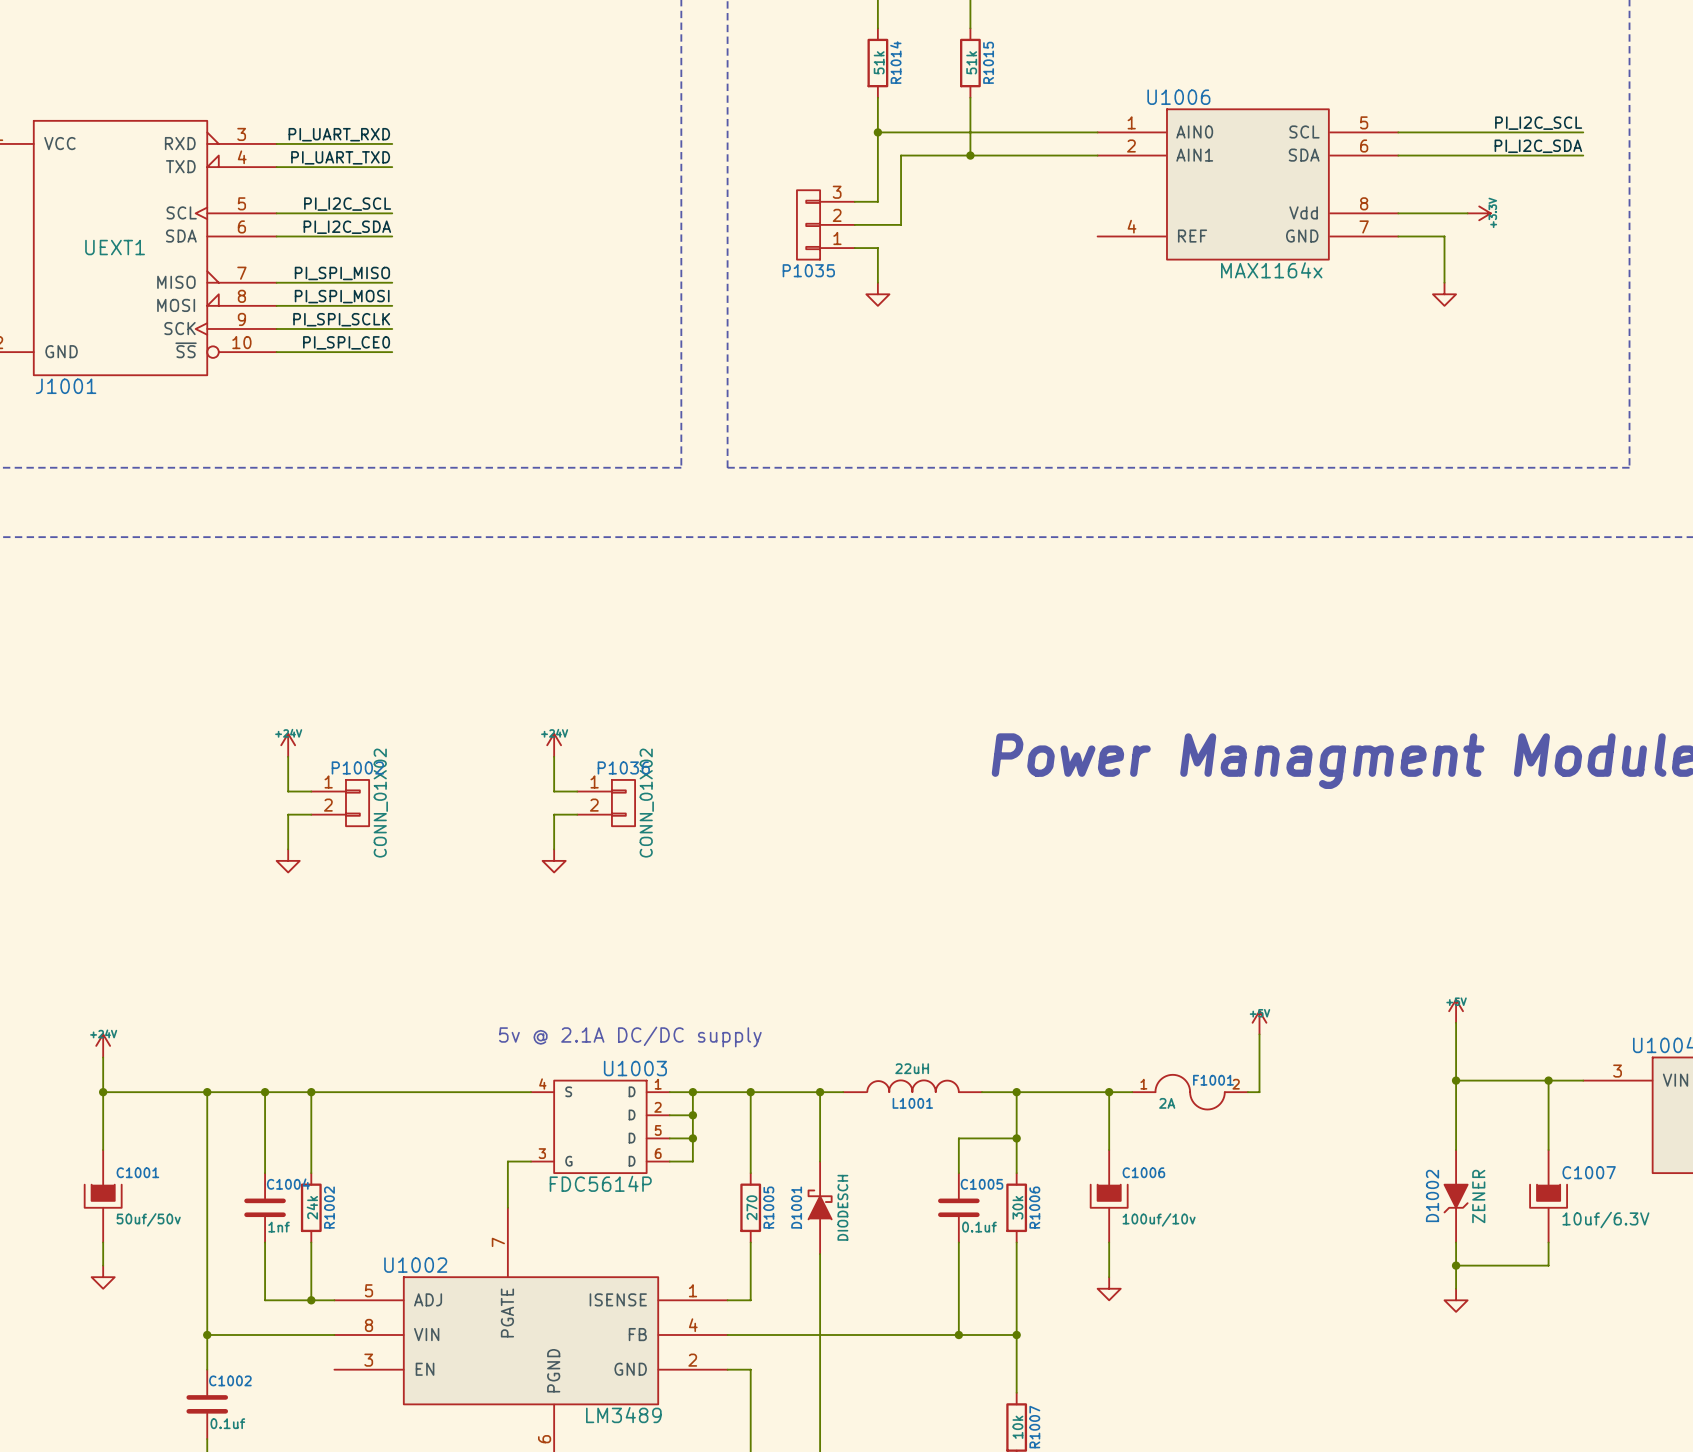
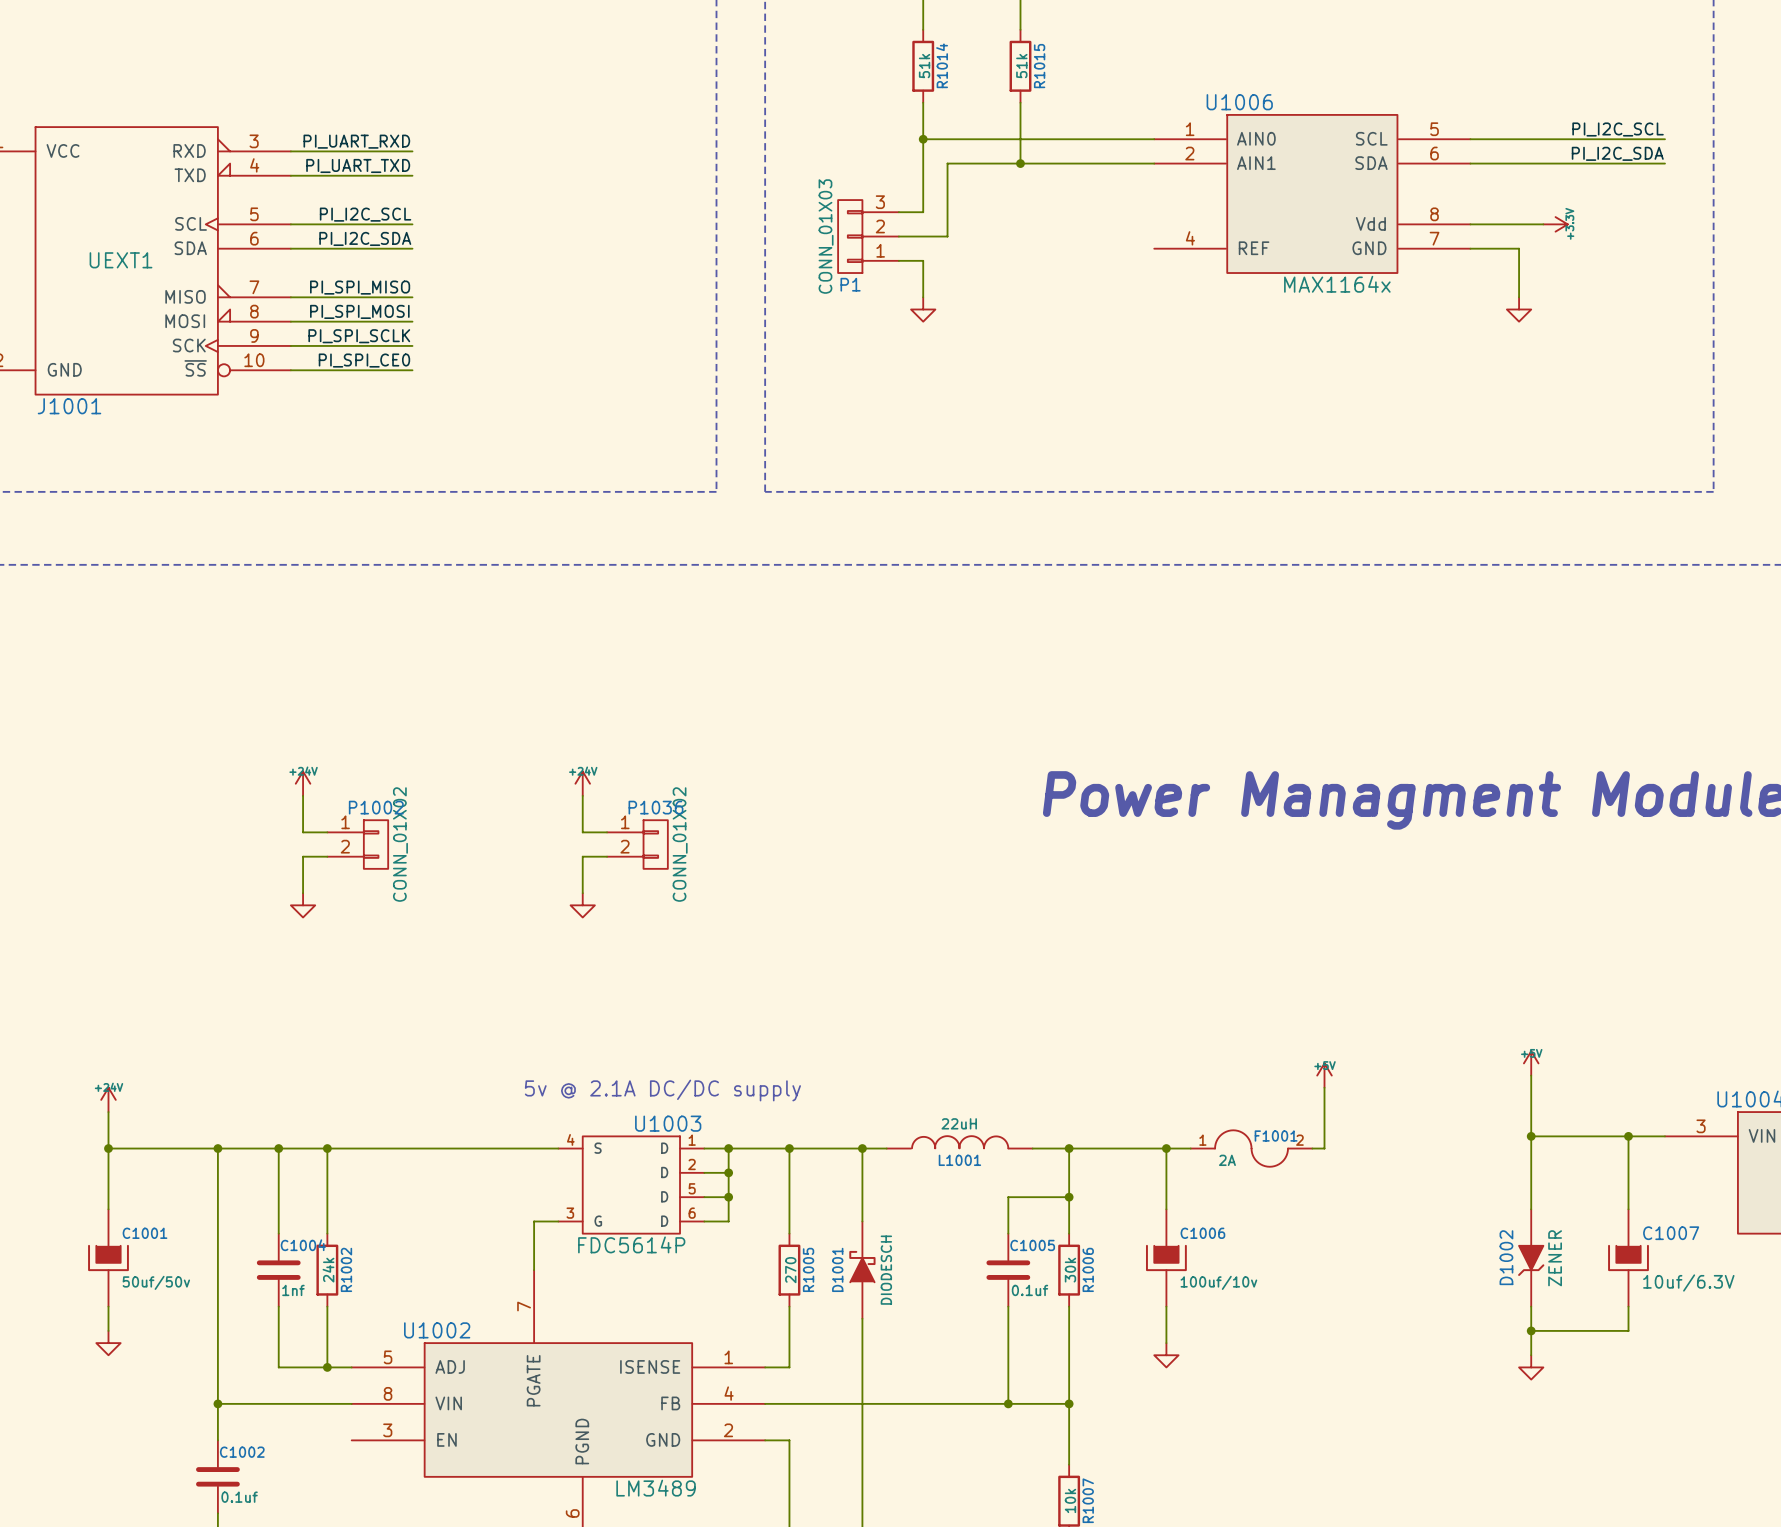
P1035 value: none -> CONN_01X03 (826, 236)
P1035 name: P1035 (808, 270) -> P1 (850, 284)

